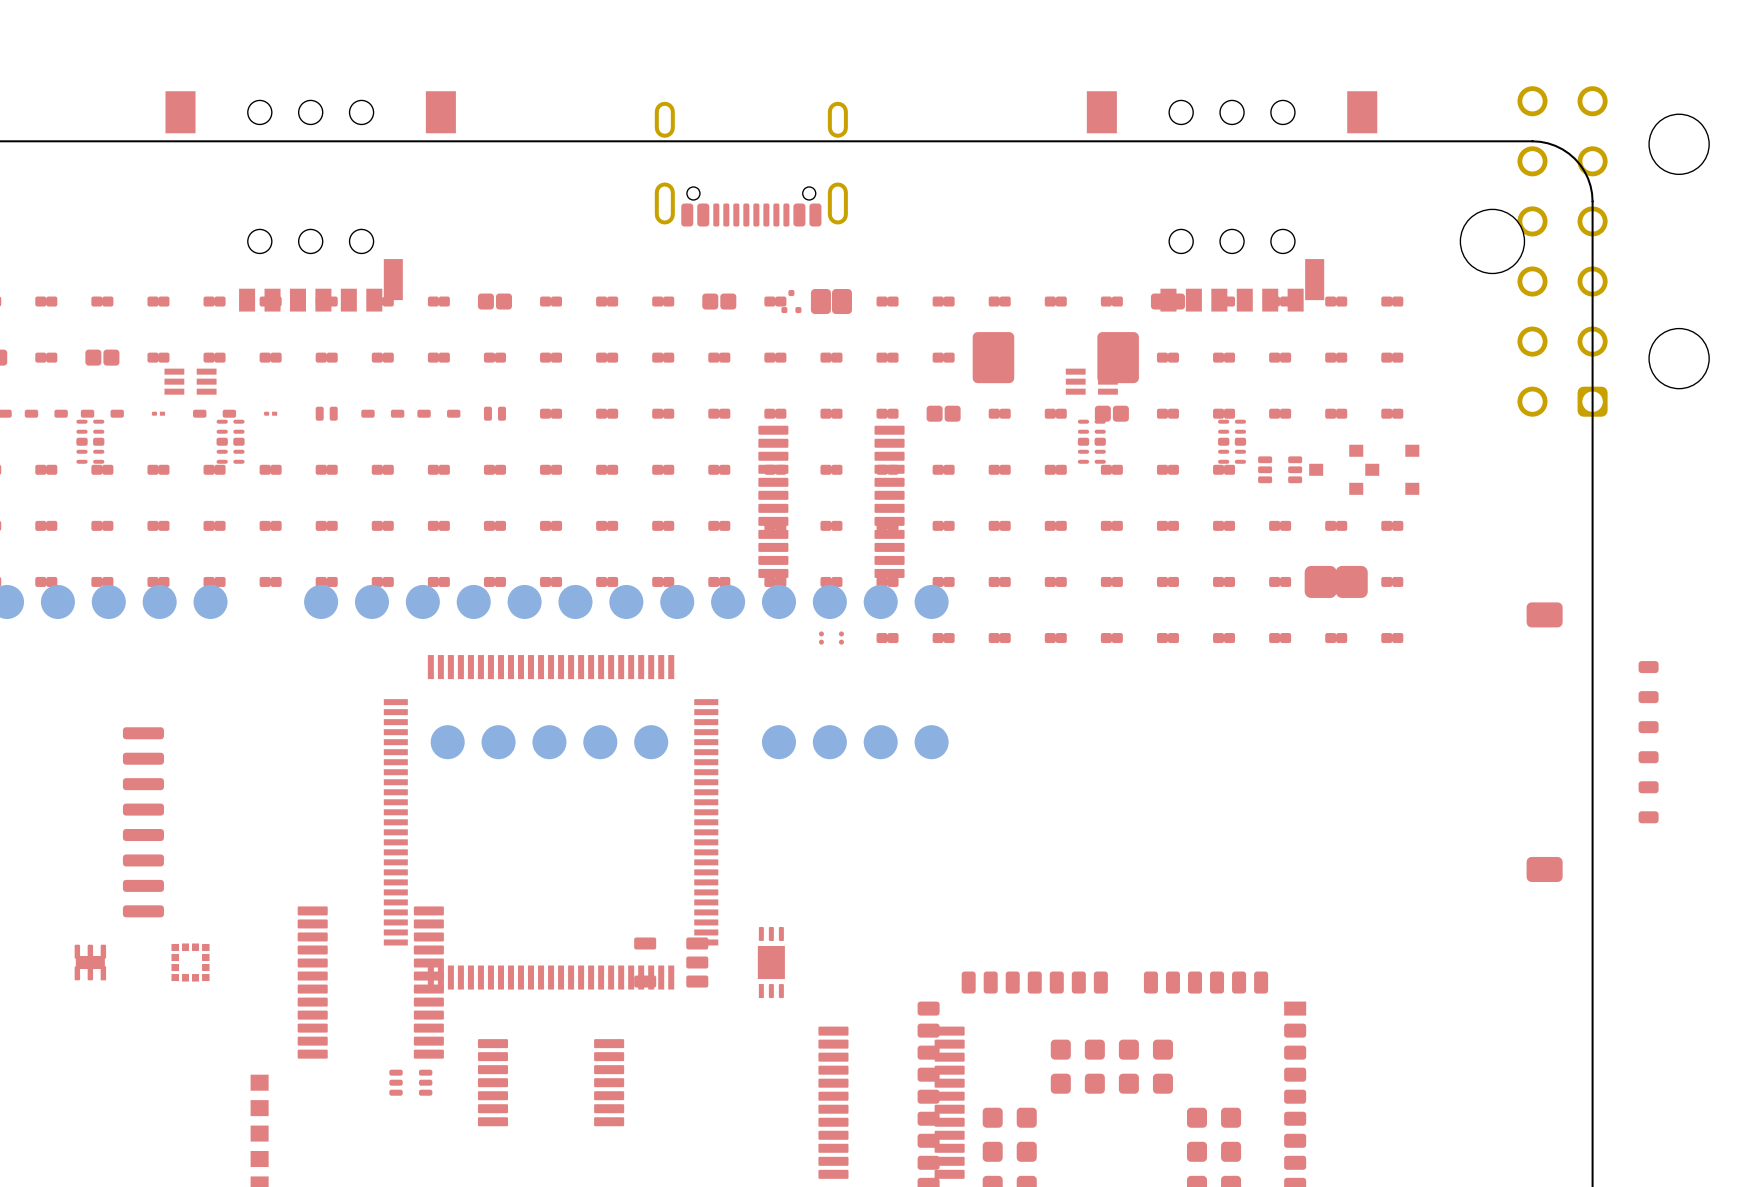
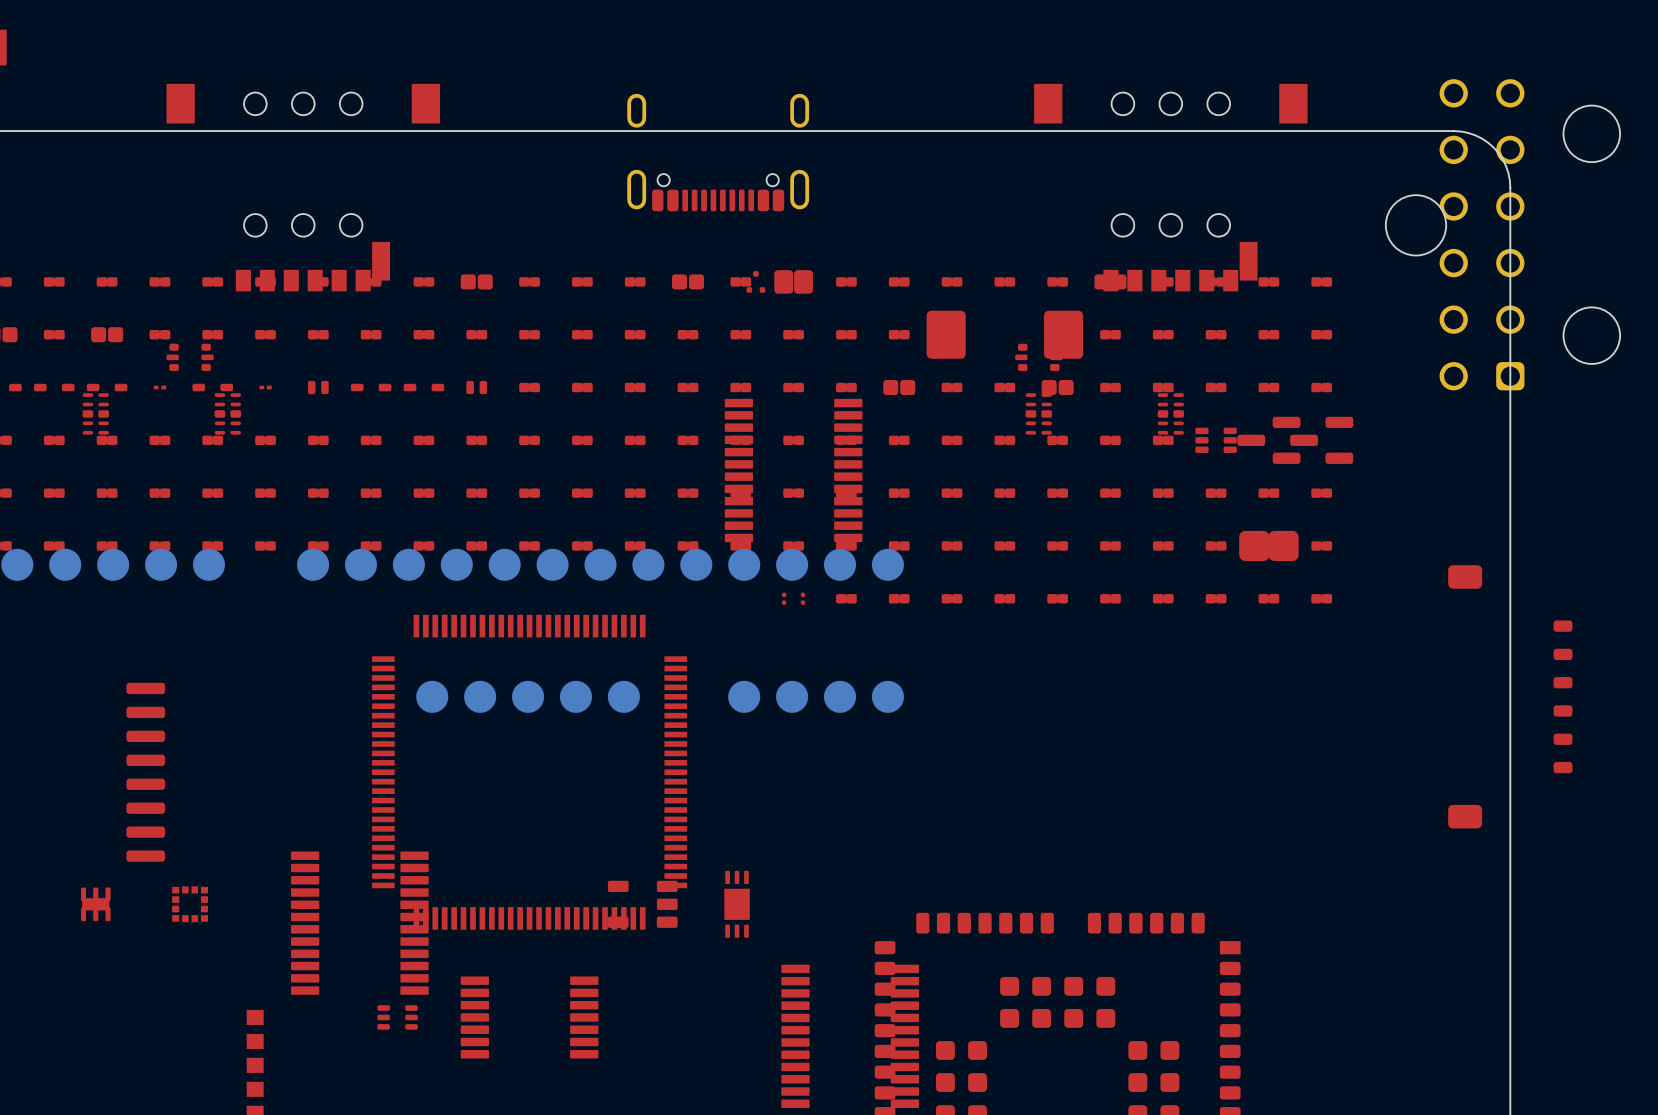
part footprint: [164, 368, 217, 395] -> [166, 343, 214, 372]
part footprint: [1065, 368, 1118, 395] -> [1015, 343, 1063, 372]
part footprint: [1309, 444, 1364, 495] -> [1237, 416, 1301, 464]
part footprint: [1365, 444, 1420, 495] -> [1290, 416, 1354, 464]

